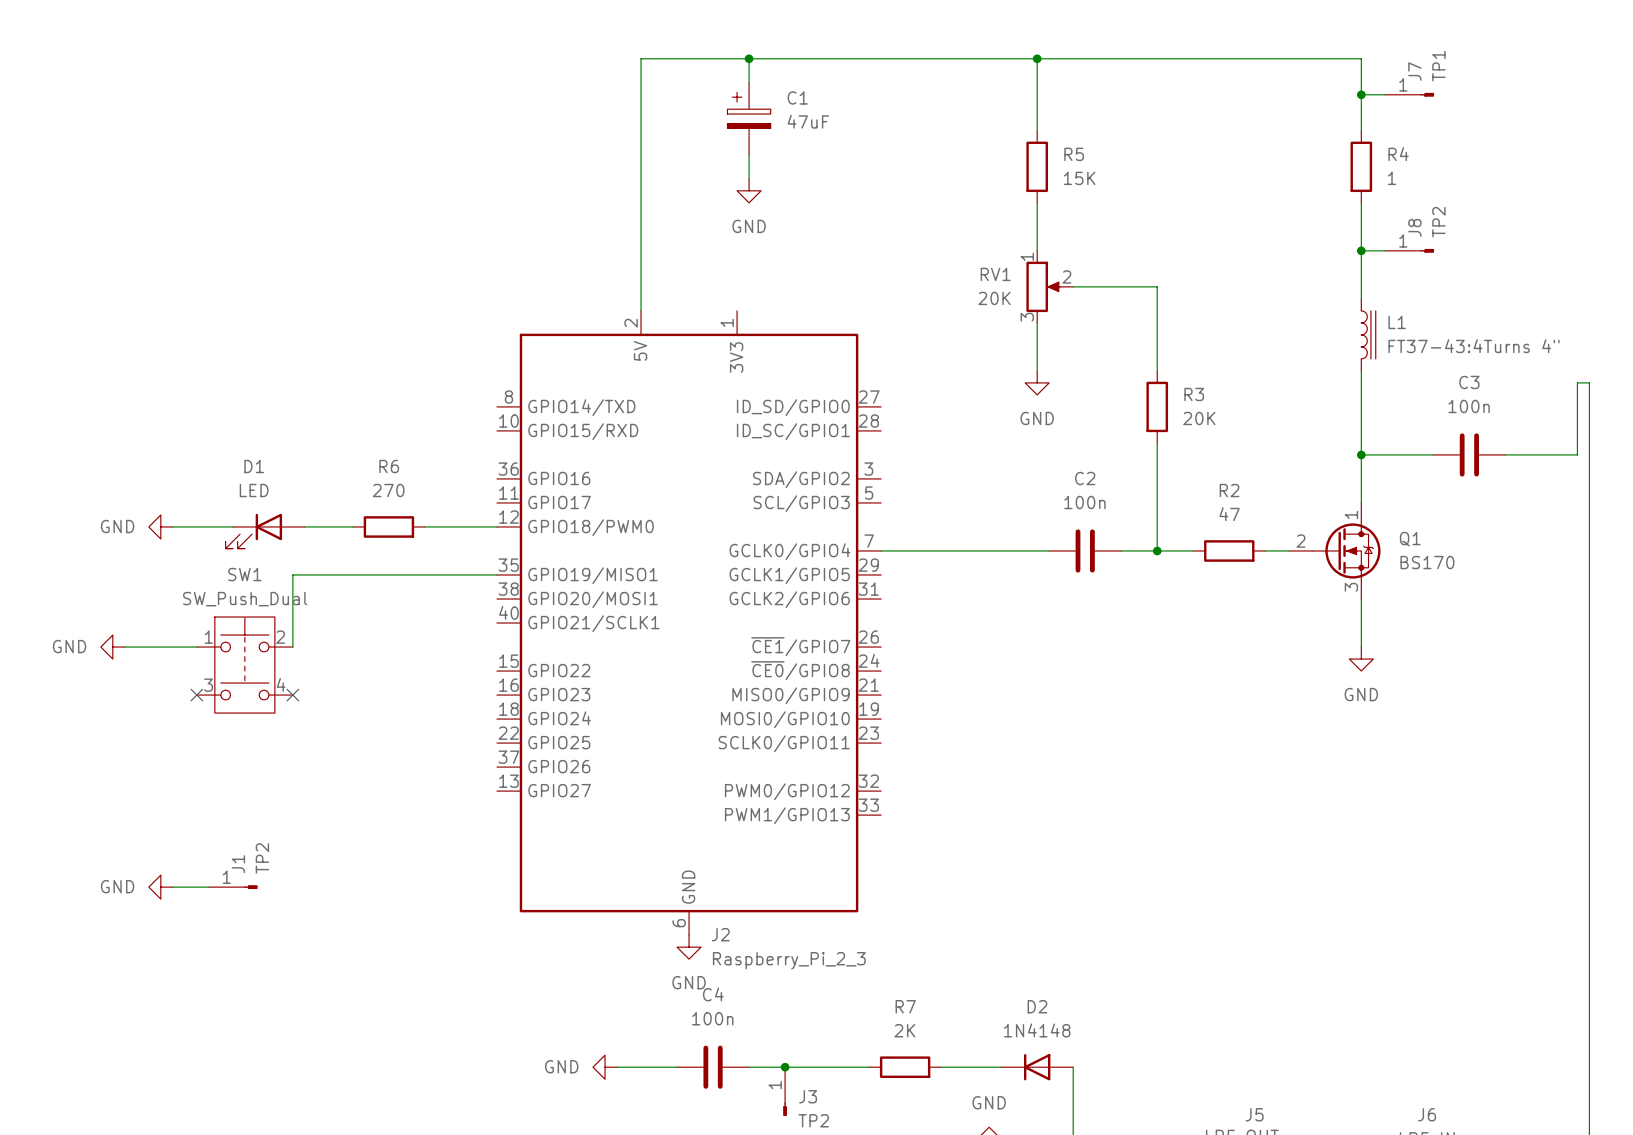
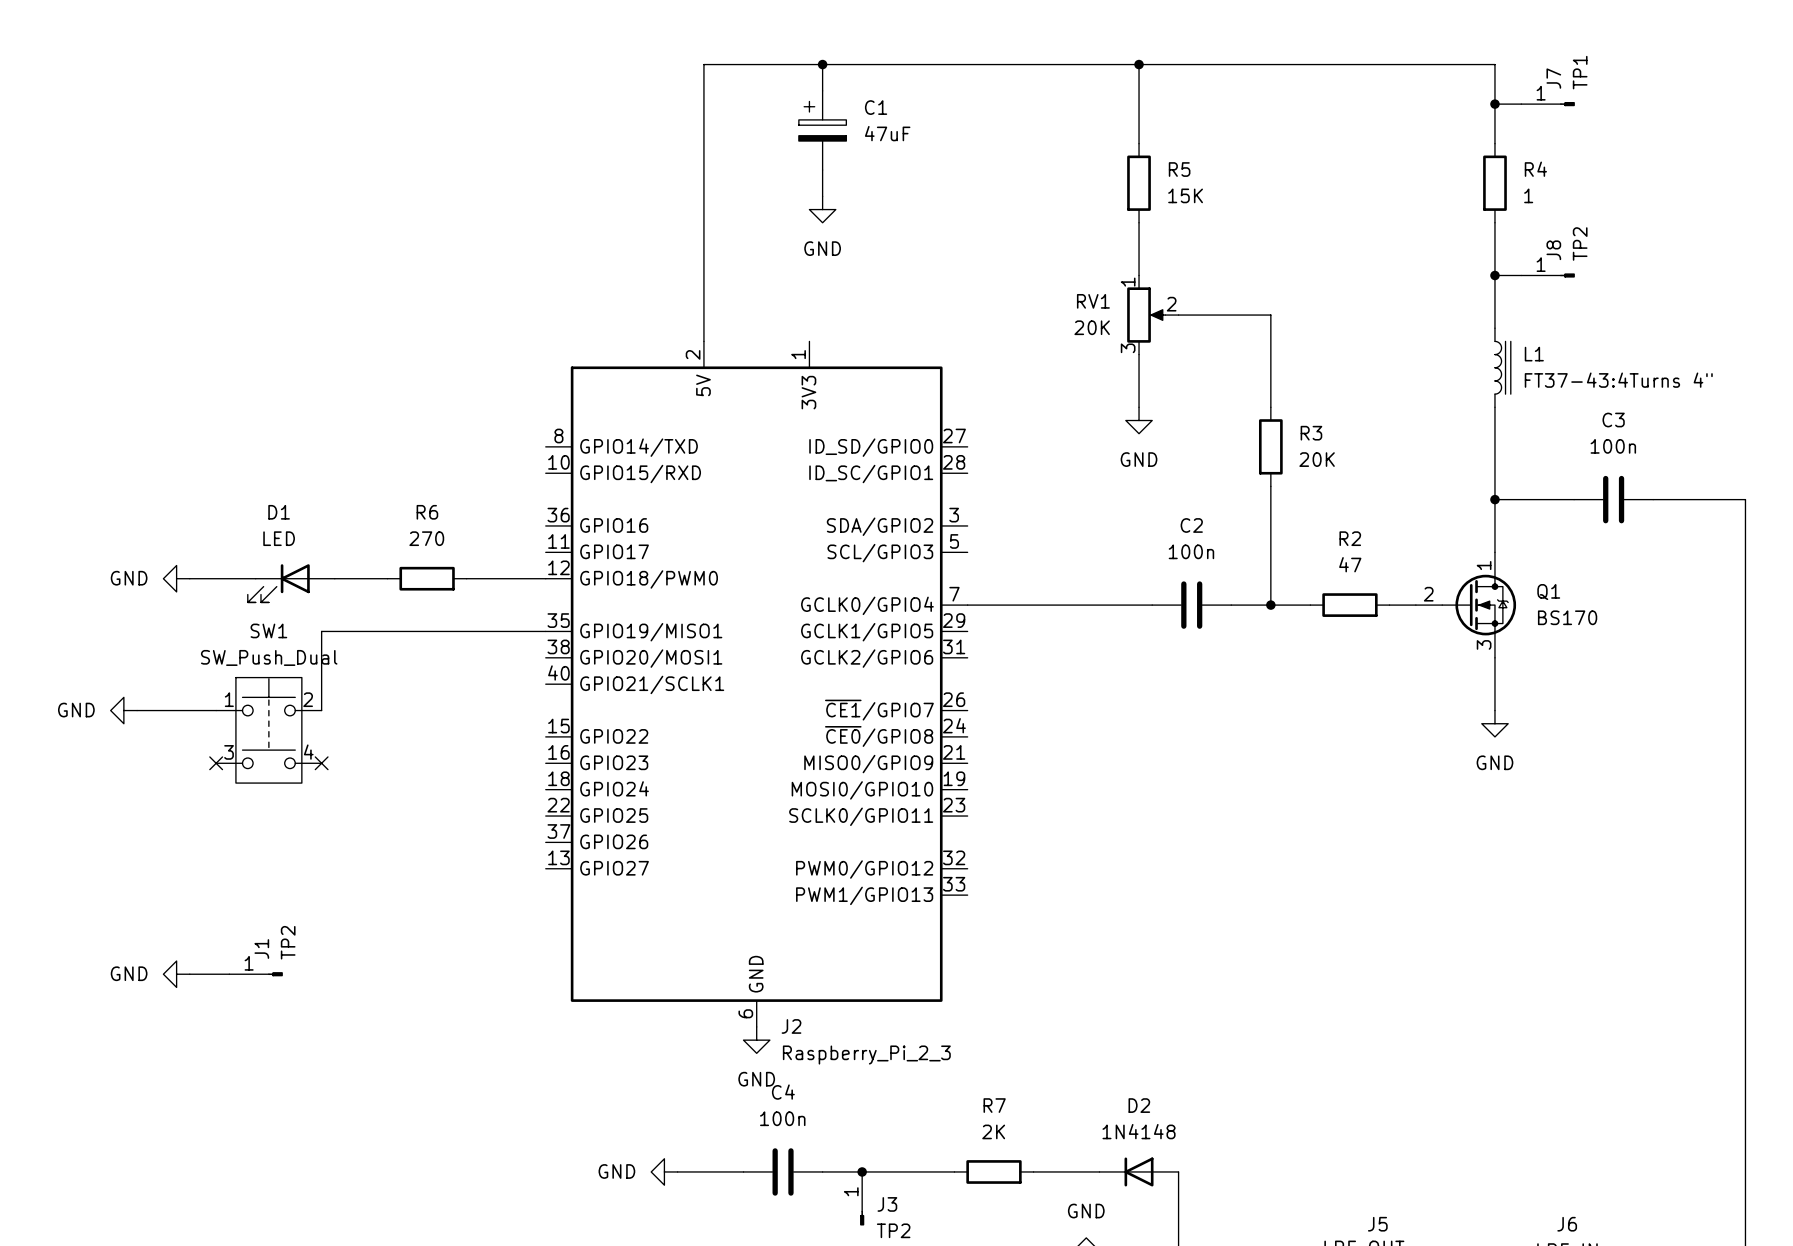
wire: (1577, 454) (1577, 382) (1589, 382) (1589, 454) -> (1732, 499) (1745, 499)

